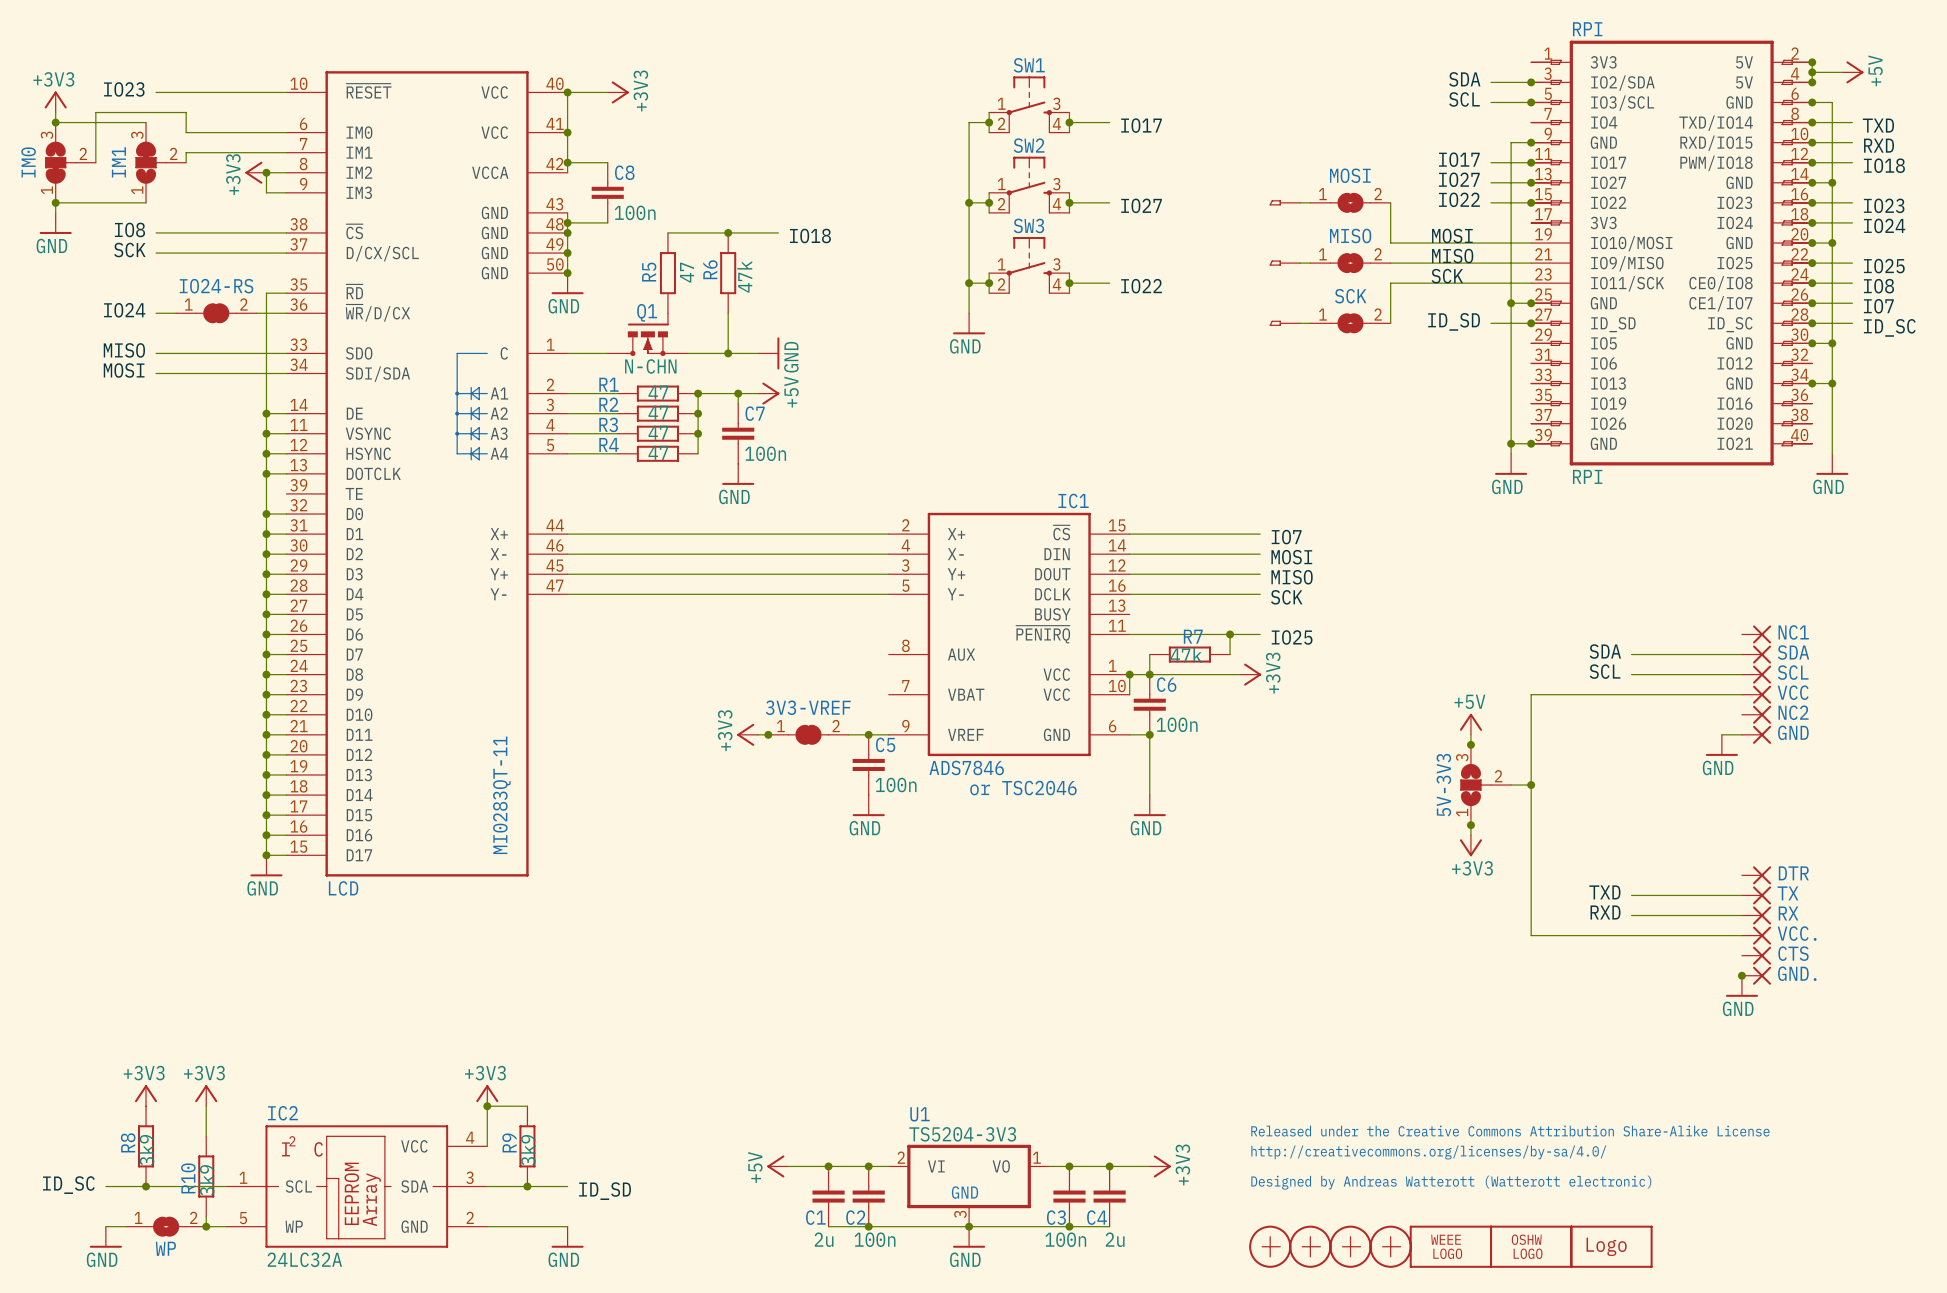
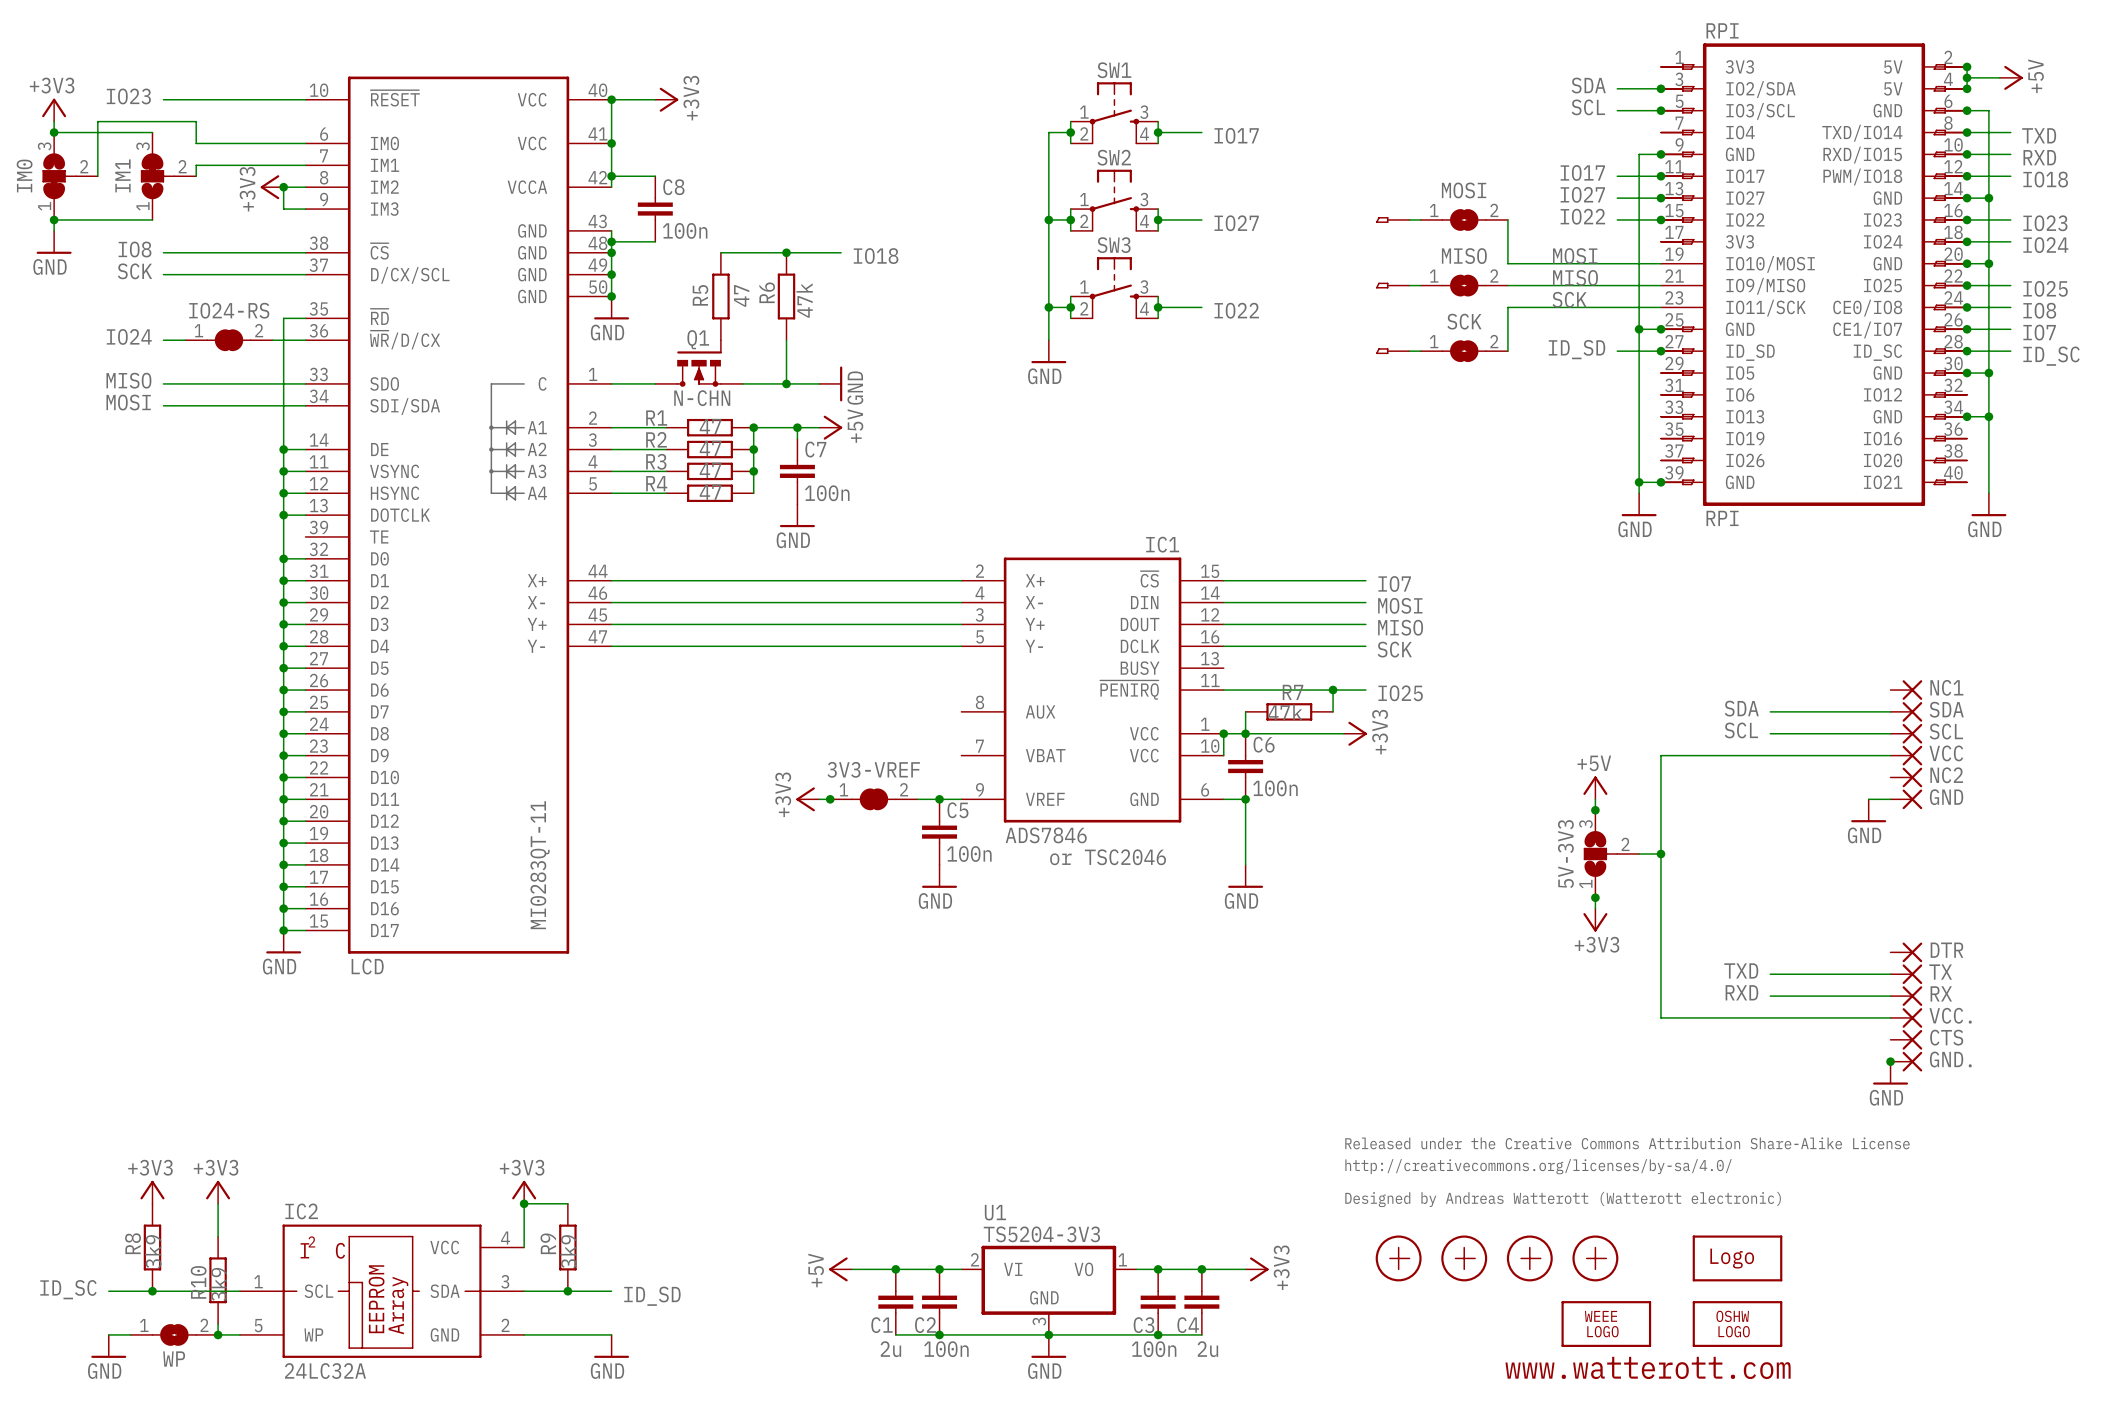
text position: Released under the Creative Commons Attribution Share-Alike License (1510, 1131) -> Released under the Creative Commons Attribution Share-Alike License (1627, 1143)
text position: http://creativecommons.org/licenses/by-sa/4.0/ (1428, 1152) -> http://creativecommons.org/licenses/by-sa/4.0/ (1538, 1166)
part: none -> (1398, 1258)
part: none -> (1464, 1258)
part: none -> (1529, 1258)
part: none -> (1595, 1258)
text position: Designed by Andreas Watterott (Watterott electronic) (1451, 1182) -> Designed by Andreas Watterott (Watterott electronic) (1563, 1199)
part: (1270, 1246) -> none
part: (1310, 1246) -> none
part: (1350, 1246) -> none
part: (1390, 1246) -> none
part position: (1450, 1246) -> (1606, 1324)
part position: (1531, 1246) -> (1737, 1324)
part position: (1611, 1246) -> (1737, 1258)
text: none -> www.watterott.com (1648, 1367)

